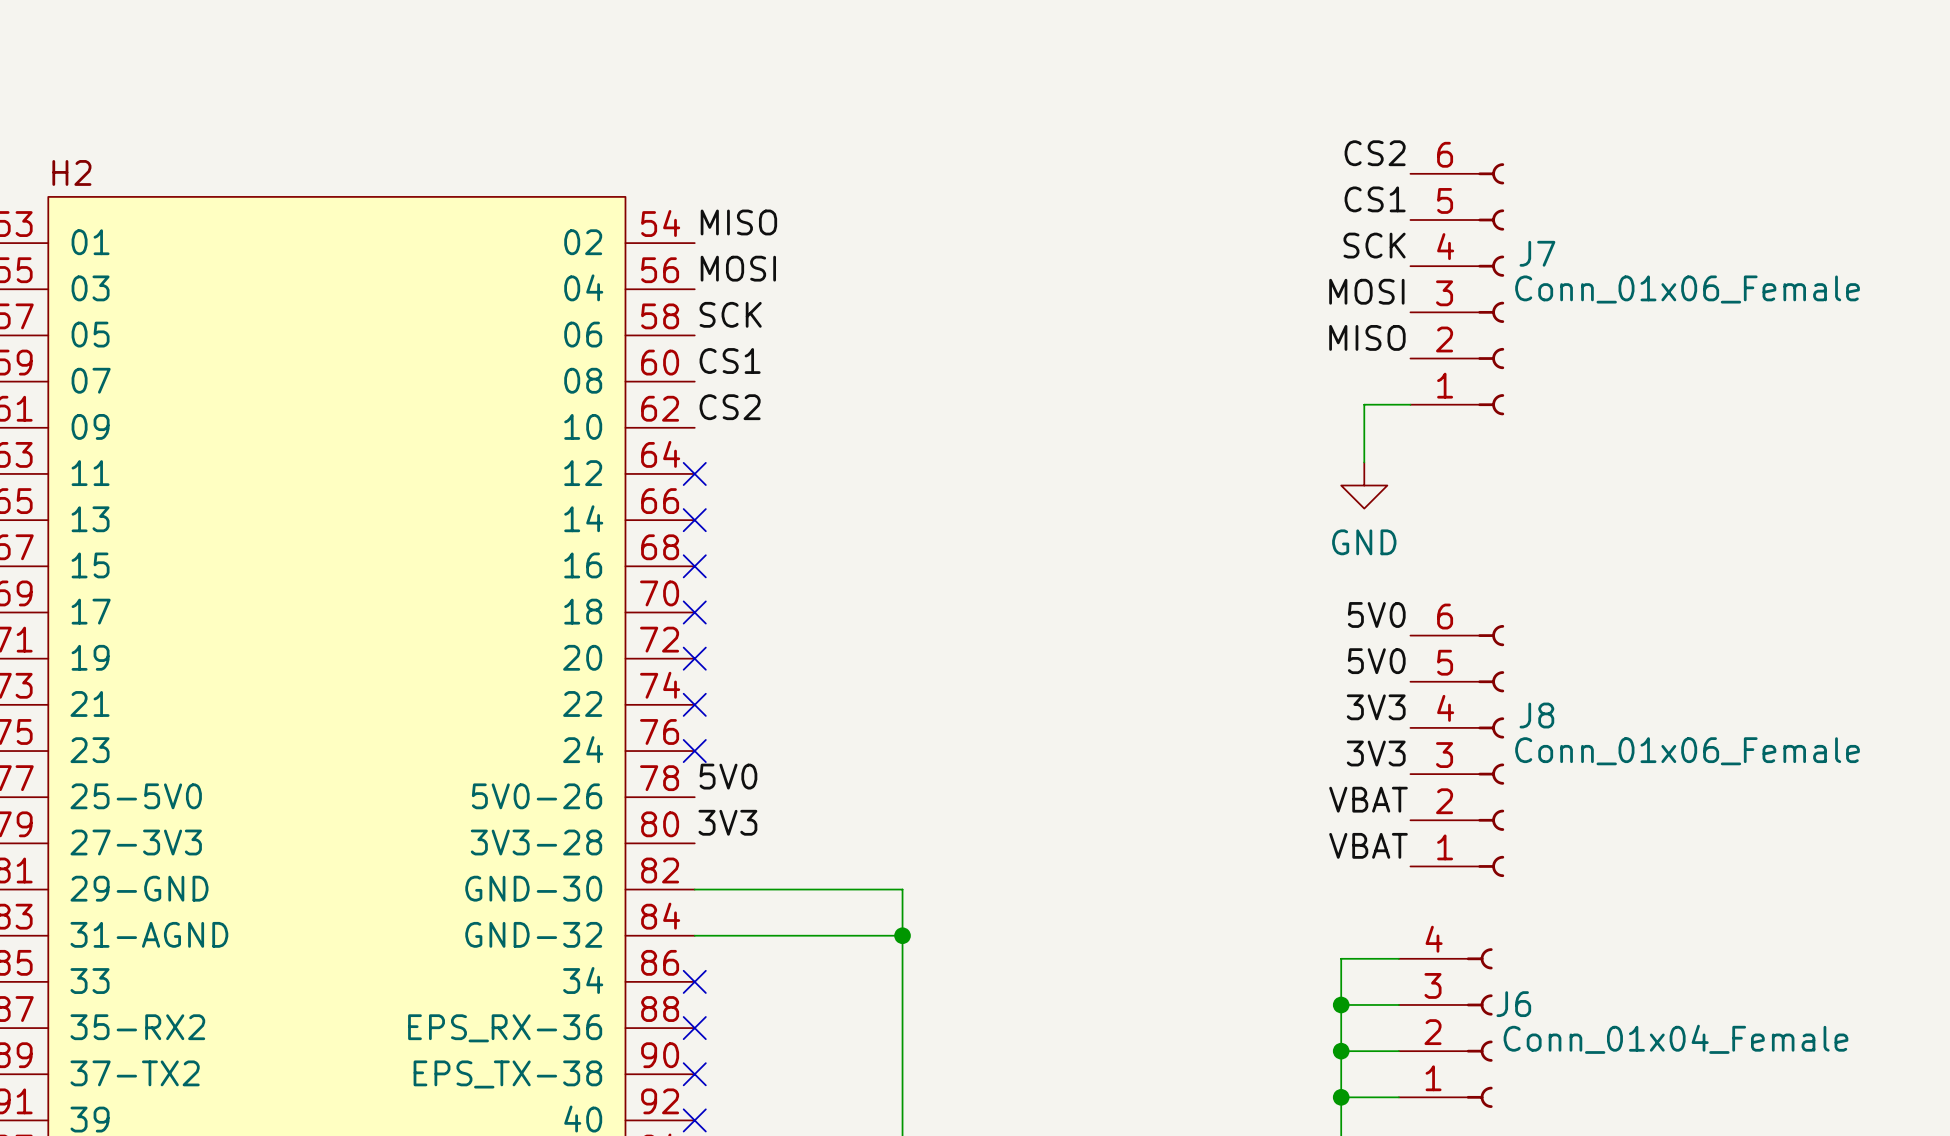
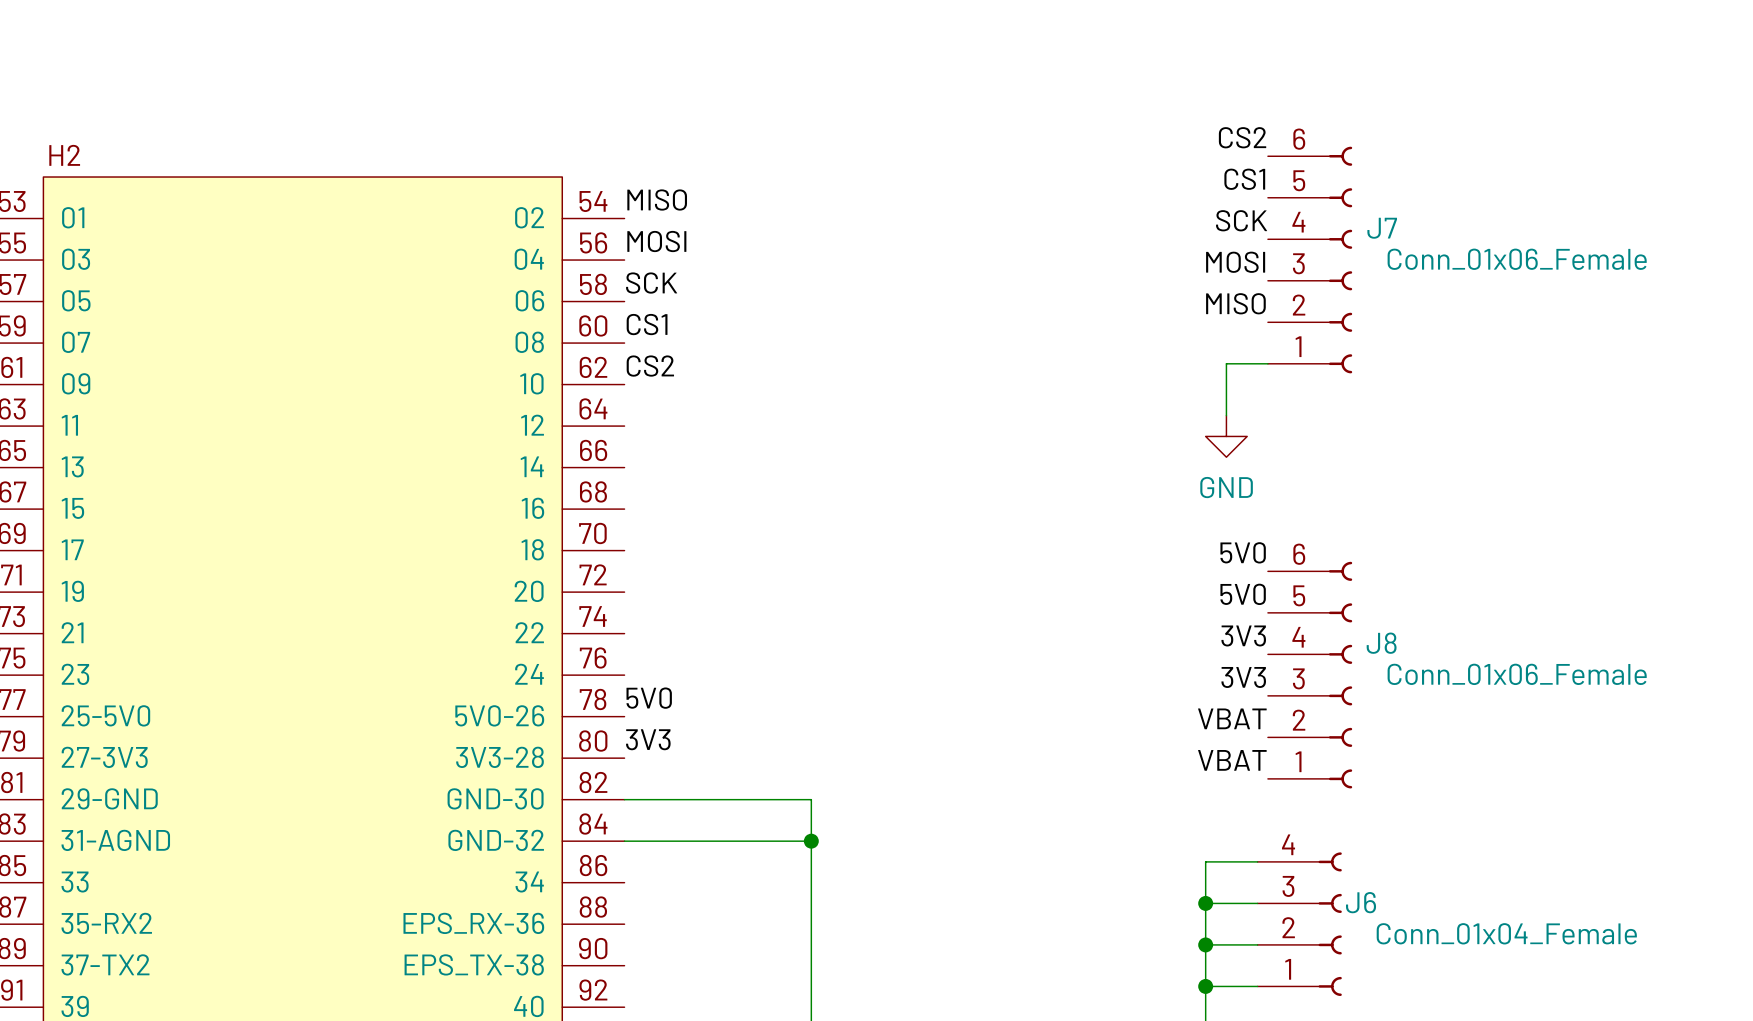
no-connect mark: (694, 473) -> none
no-connect mark: (694, 520) -> none
no-connect mark: (694, 566) -> none
no-connect mark: (694, 612) -> none
no-connect mark: (694, 658) -> none
no-connect mark: (694, 704) -> none
no-connect mark: (694, 751) -> none
no-connect mark: (694, 981) -> none
no-connect mark: (694, 1028) -> none
no-connect mark: (694, 1074) -> none
no-connect mark: (694, 1120) -> none

